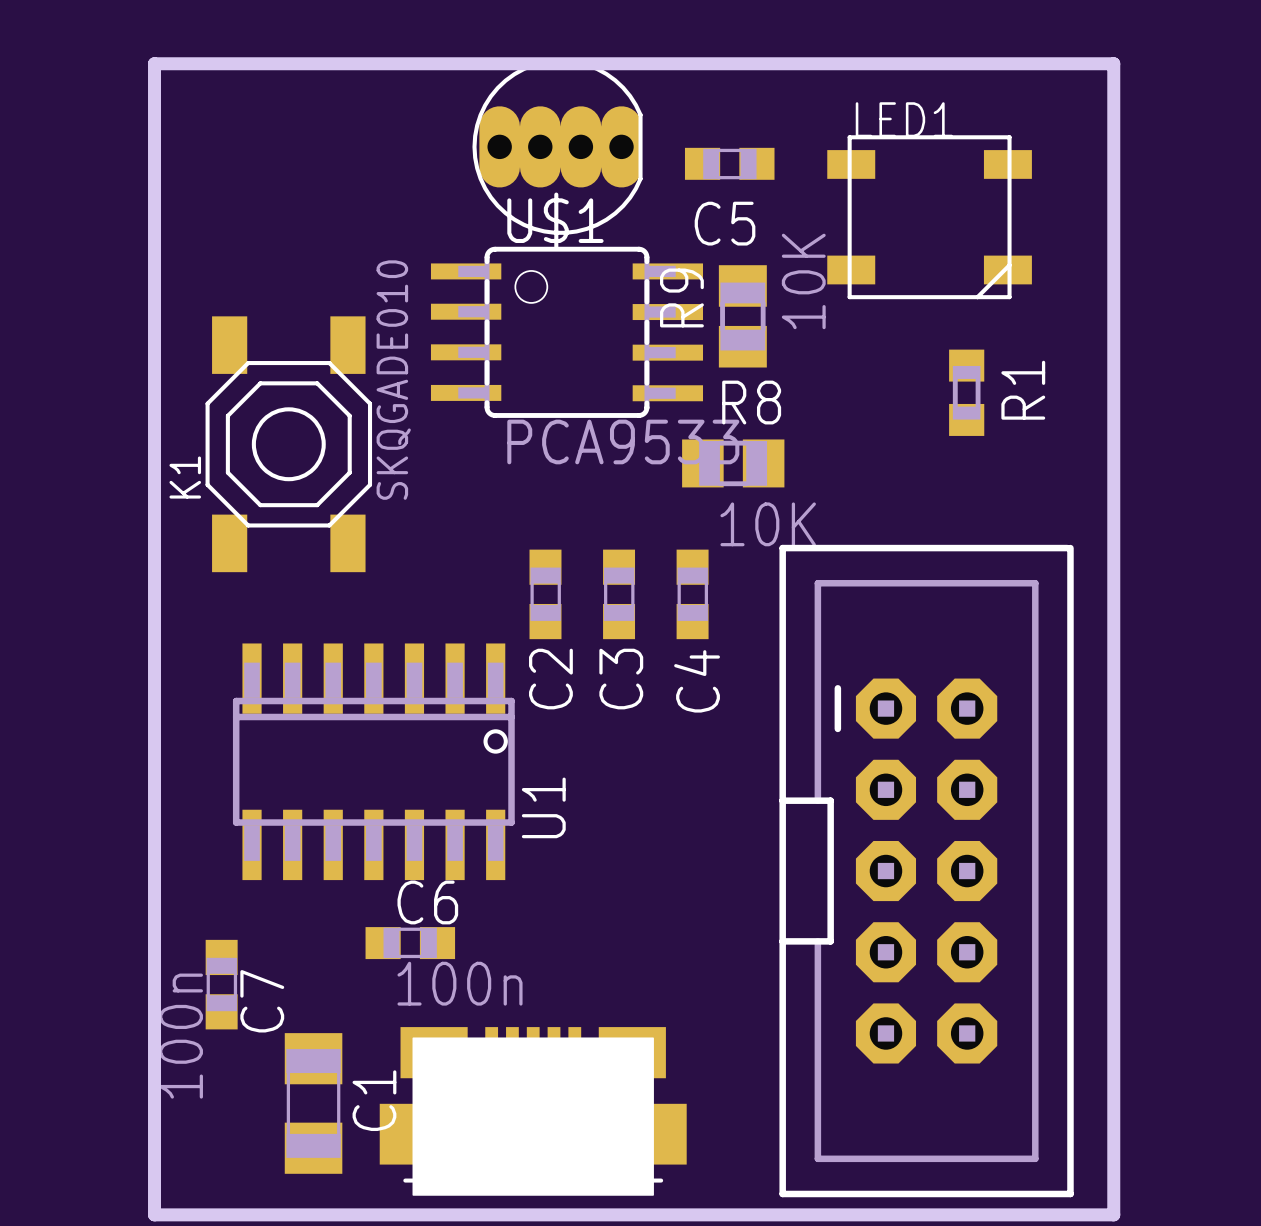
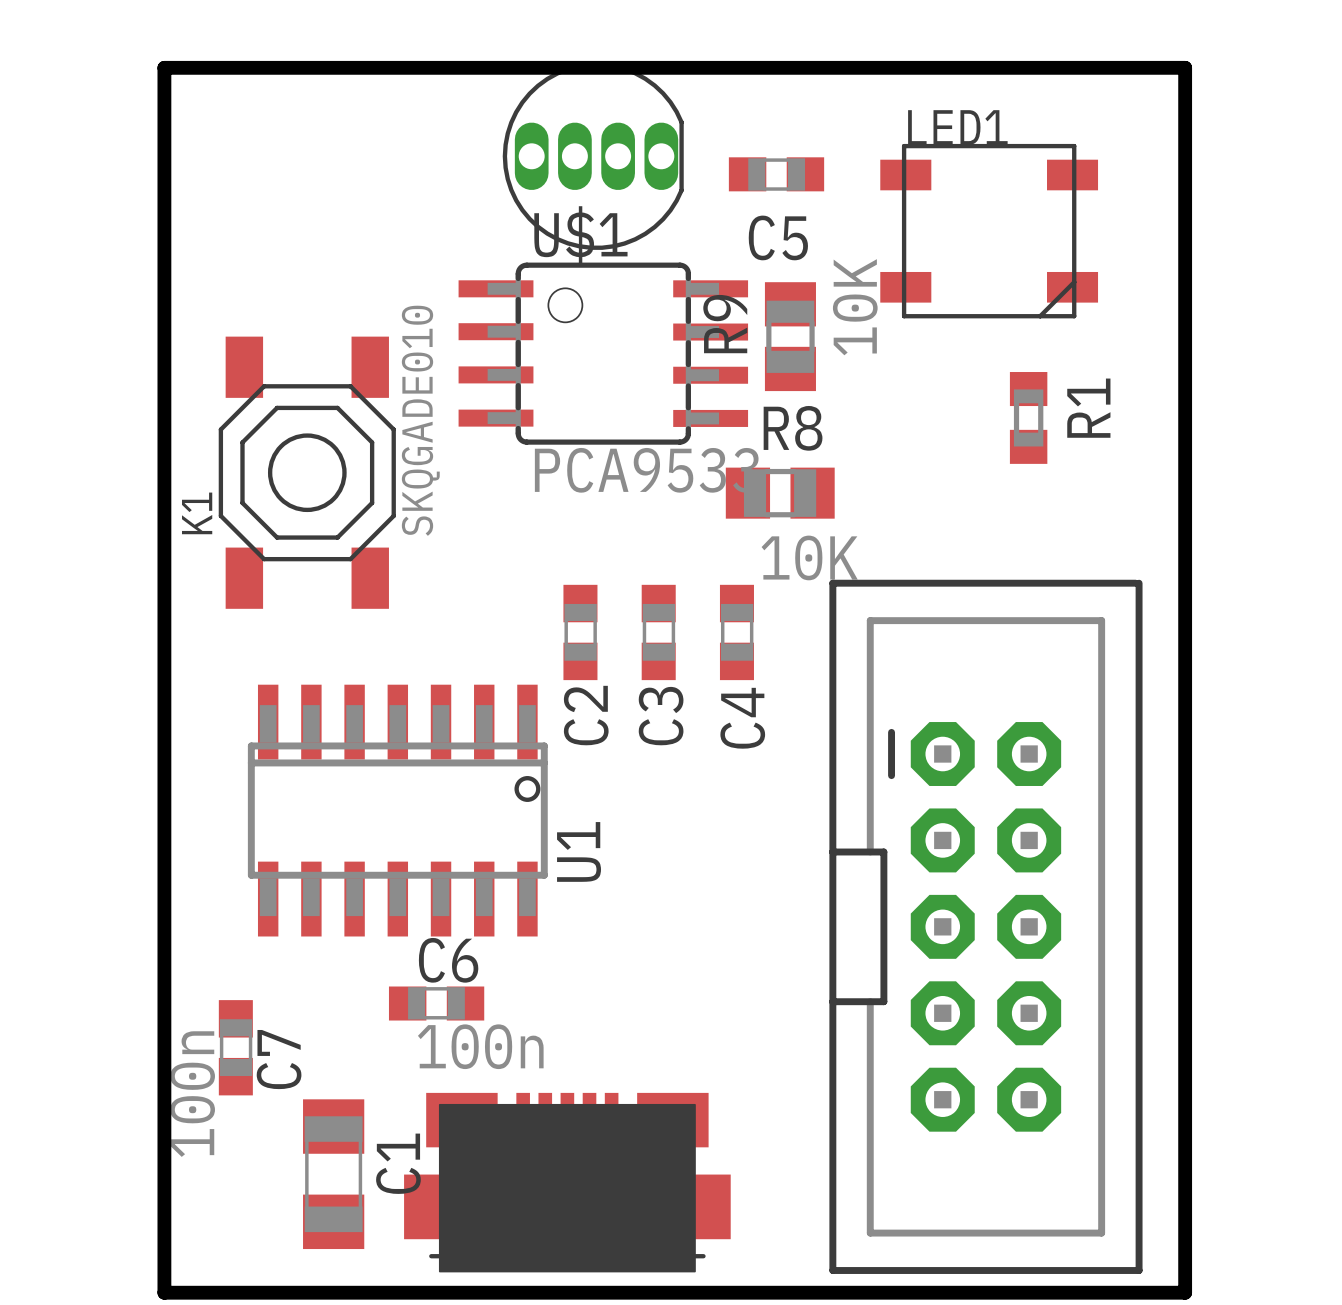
part footprint: [472, 58, 643, 235] -> [502, 62, 684, 250]

